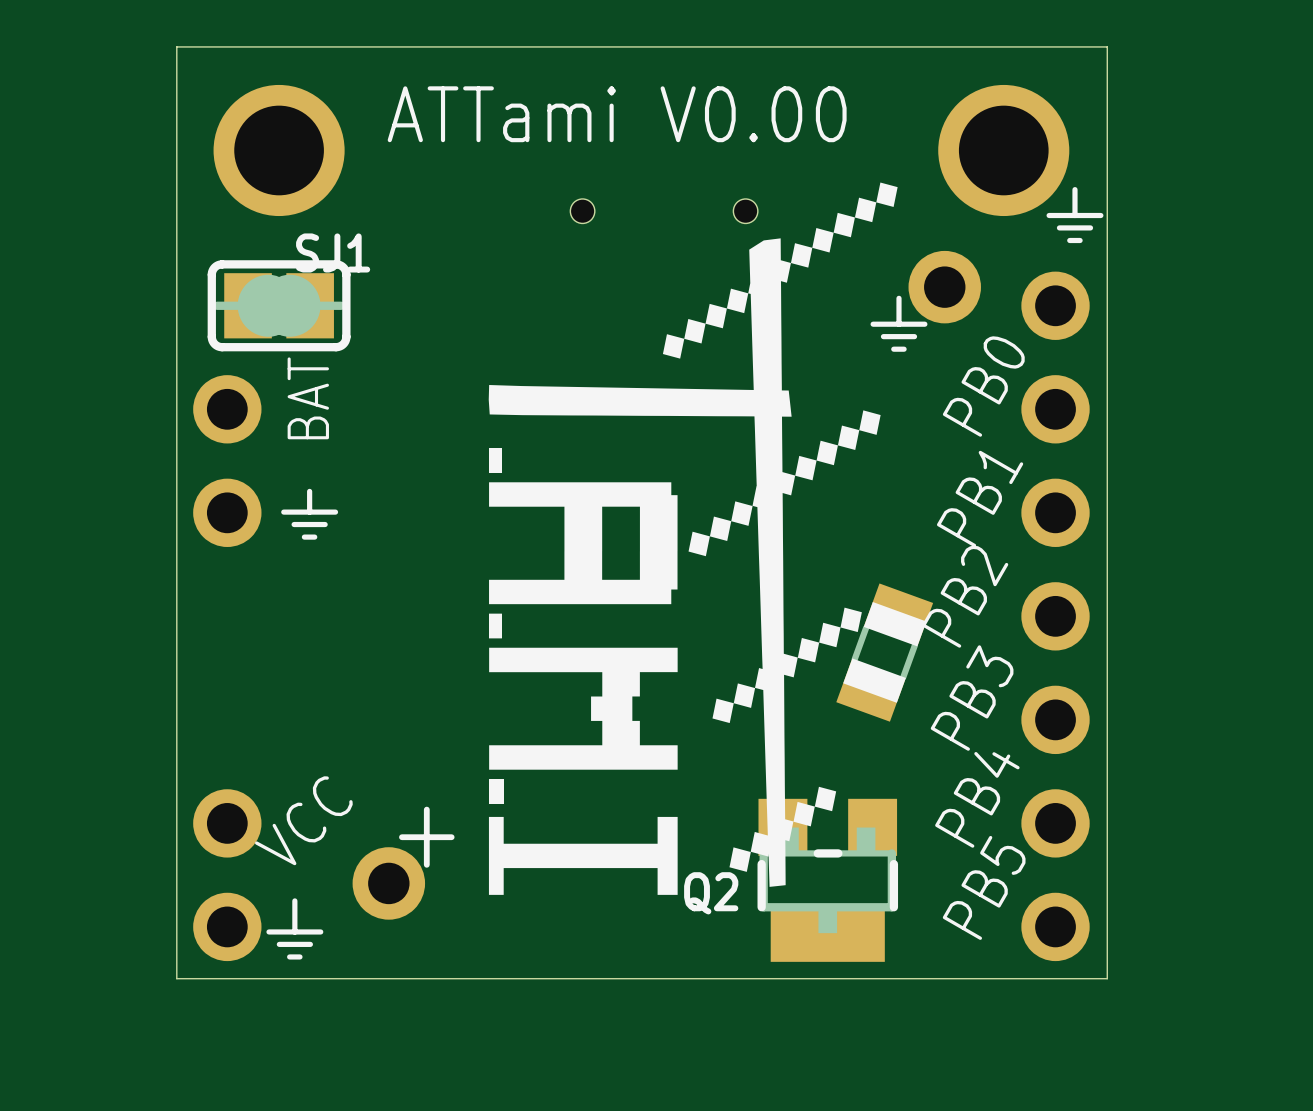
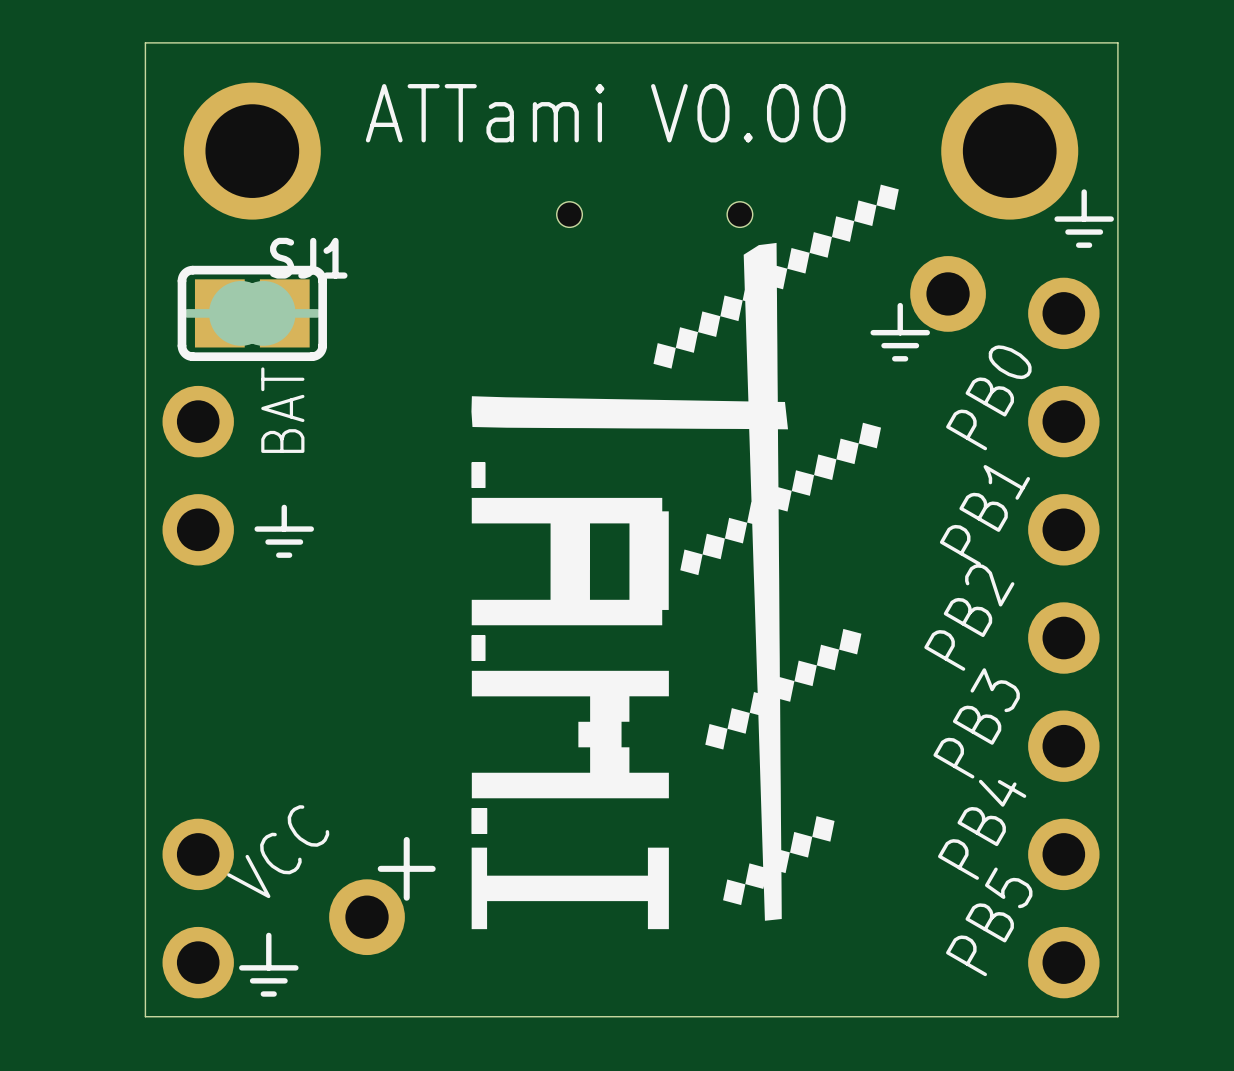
part: (884, 652) -> none
Q2: (827, 880) -> none

